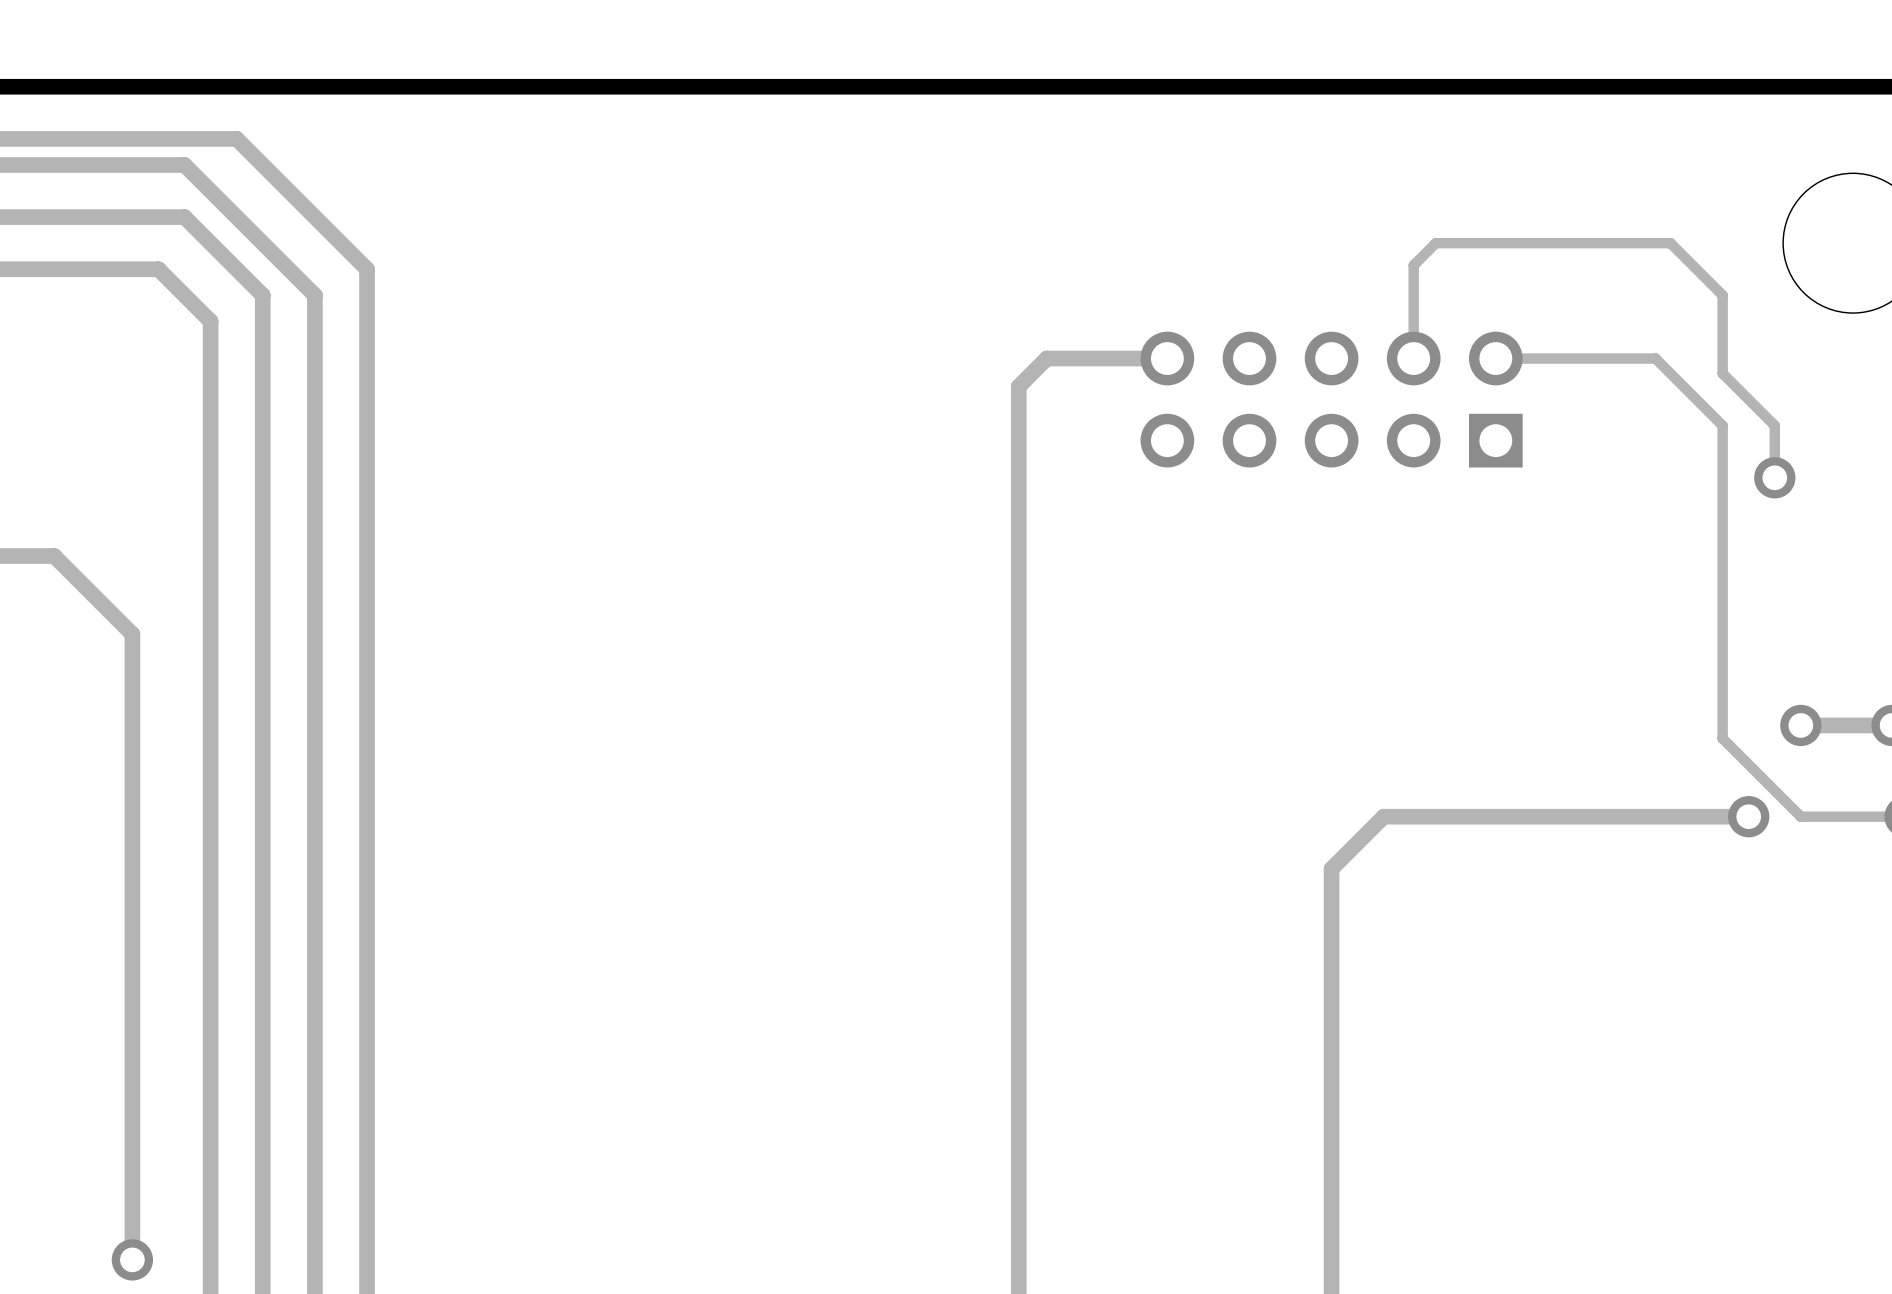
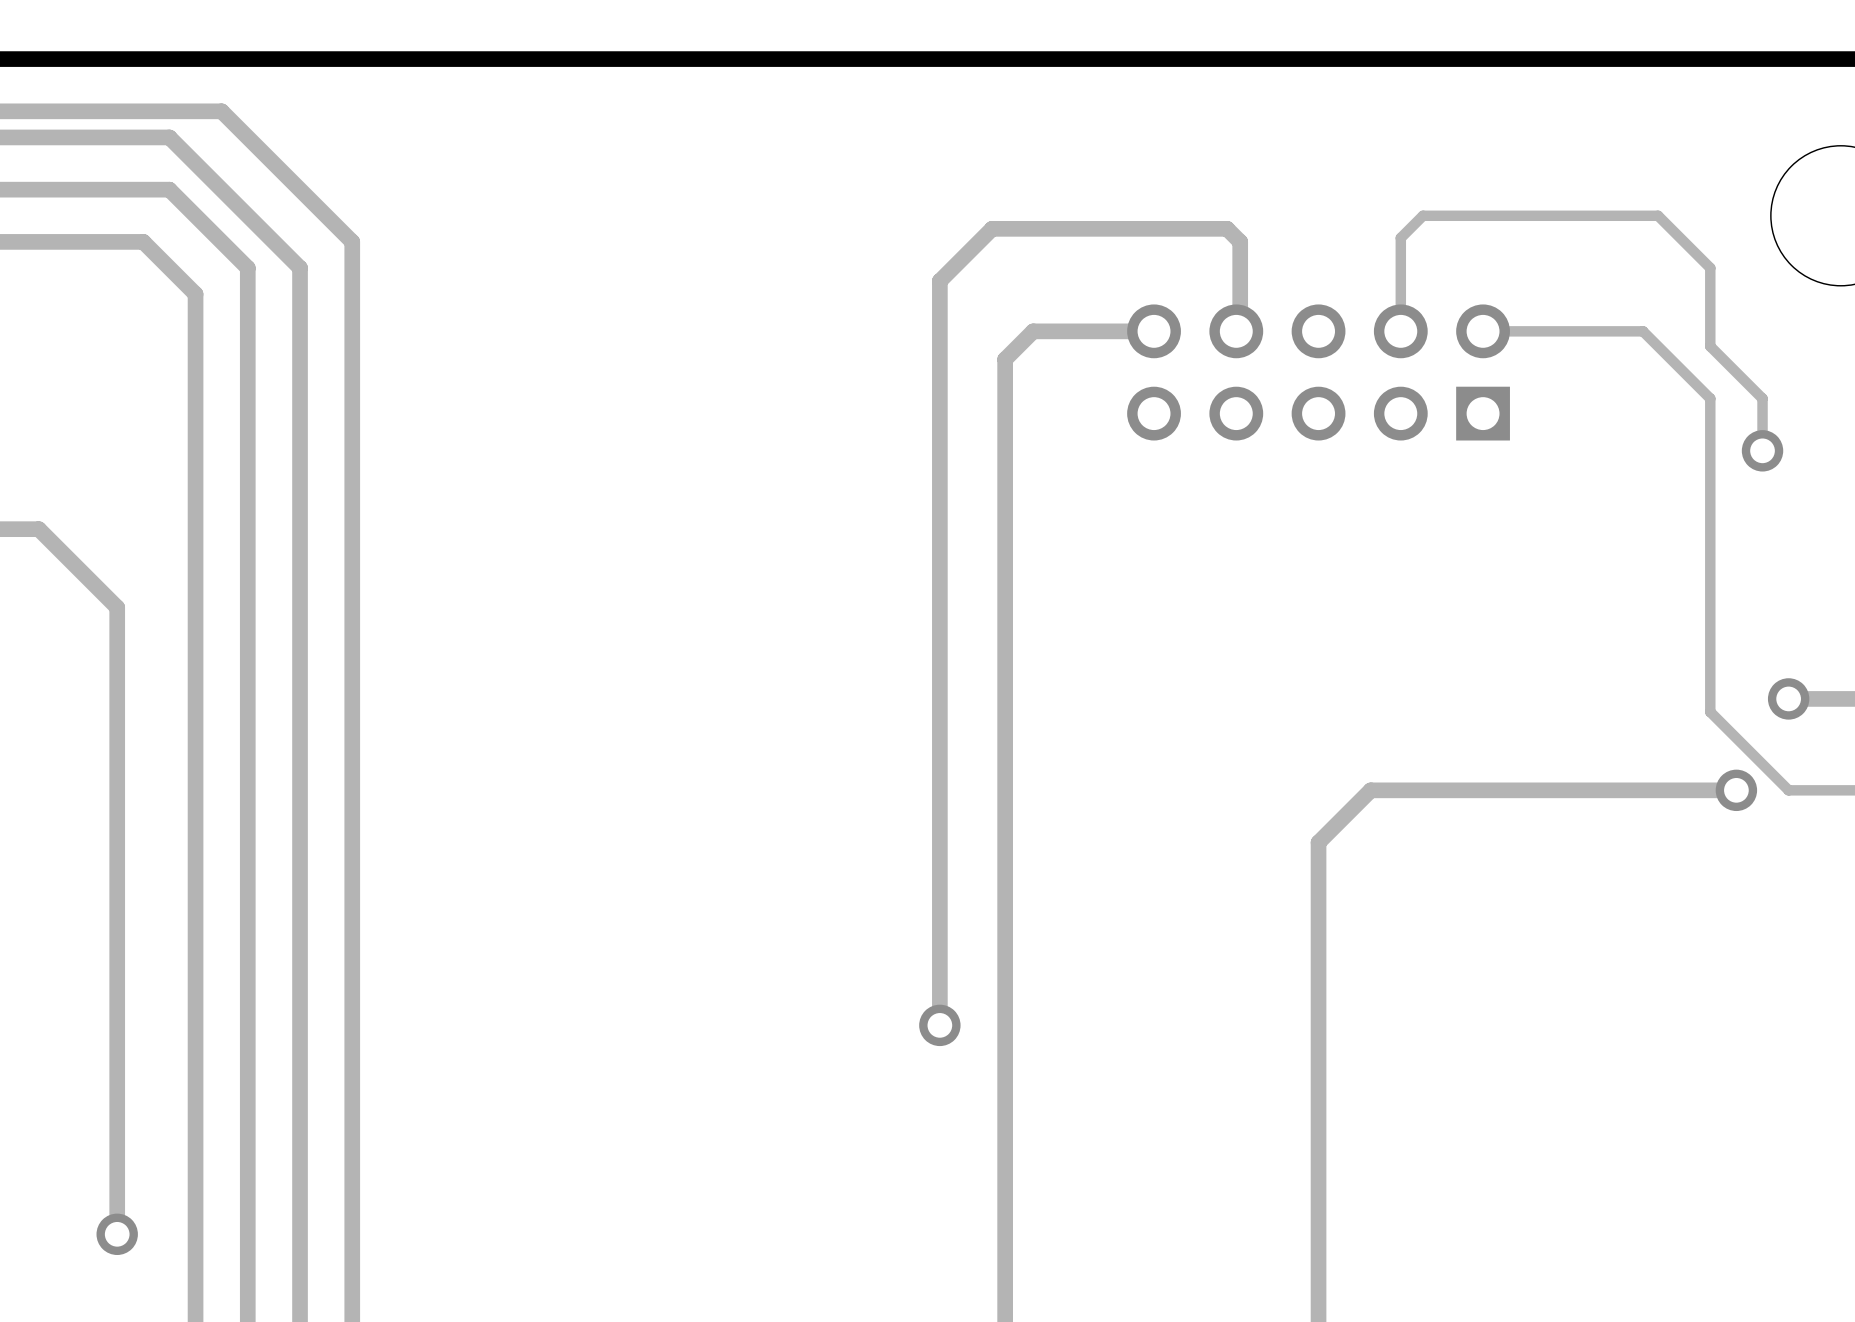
track: none -> (1236, 331) (1240, 327) (1240, 241) (1227, 228) (992, 228) (939, 281) (939, 1025)
via: none -> (939, 1025)

